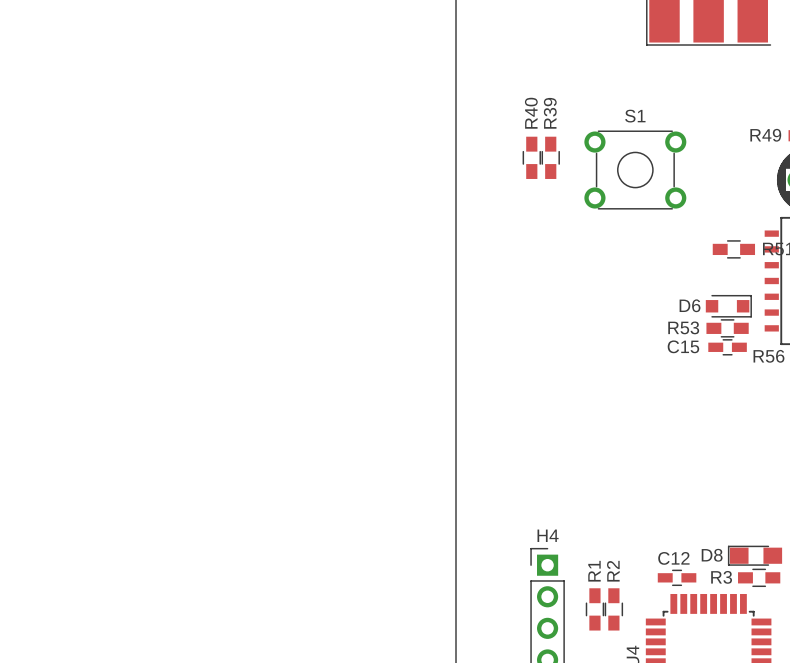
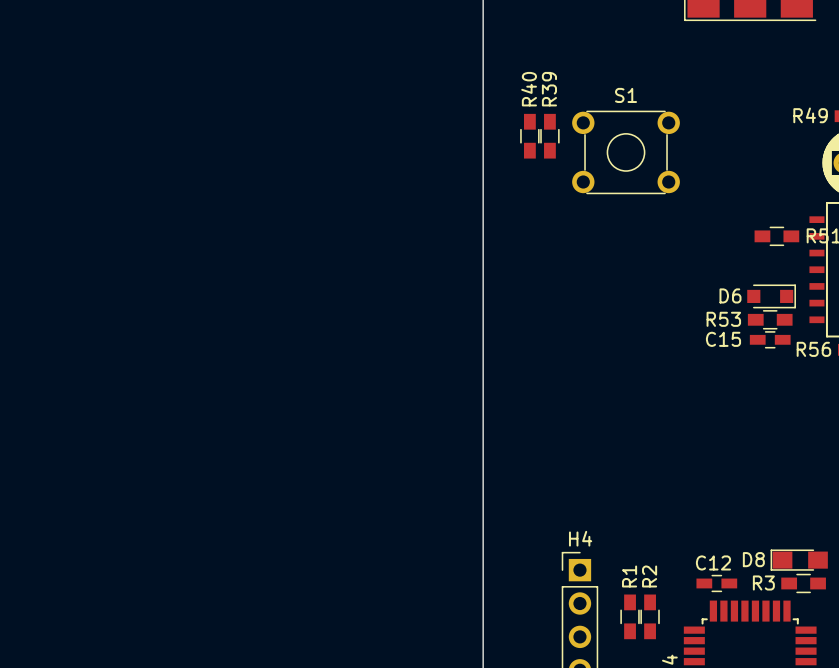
R40 position: (531, 157) -> (529, 136)
R39 position: (550, 157) -> (549, 136)
S1 position: (635, 170) -> (626, 152)

